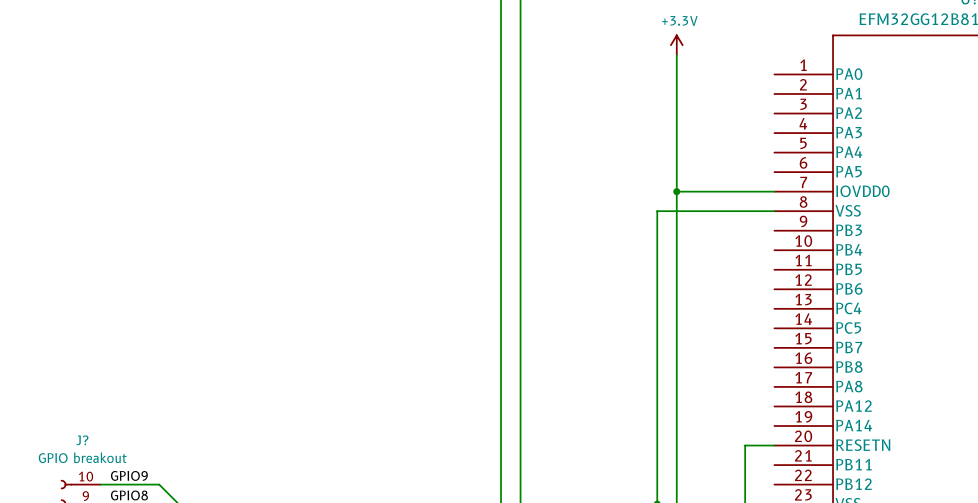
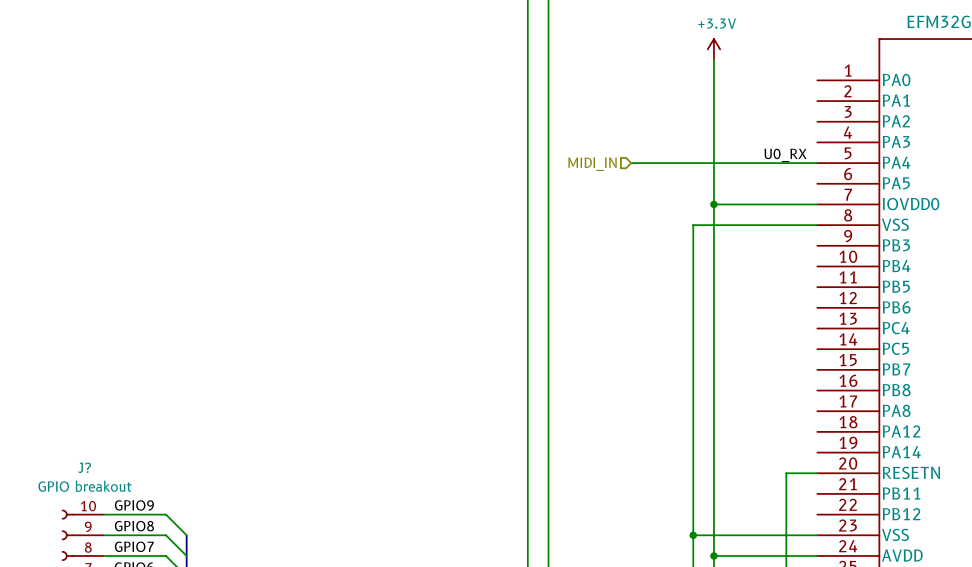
label: none -> U0_RX (785, 155)
wire: none -> (631, 163) (817, 163)
hierarchical label: none -> MIDI_IN (592, 164)

